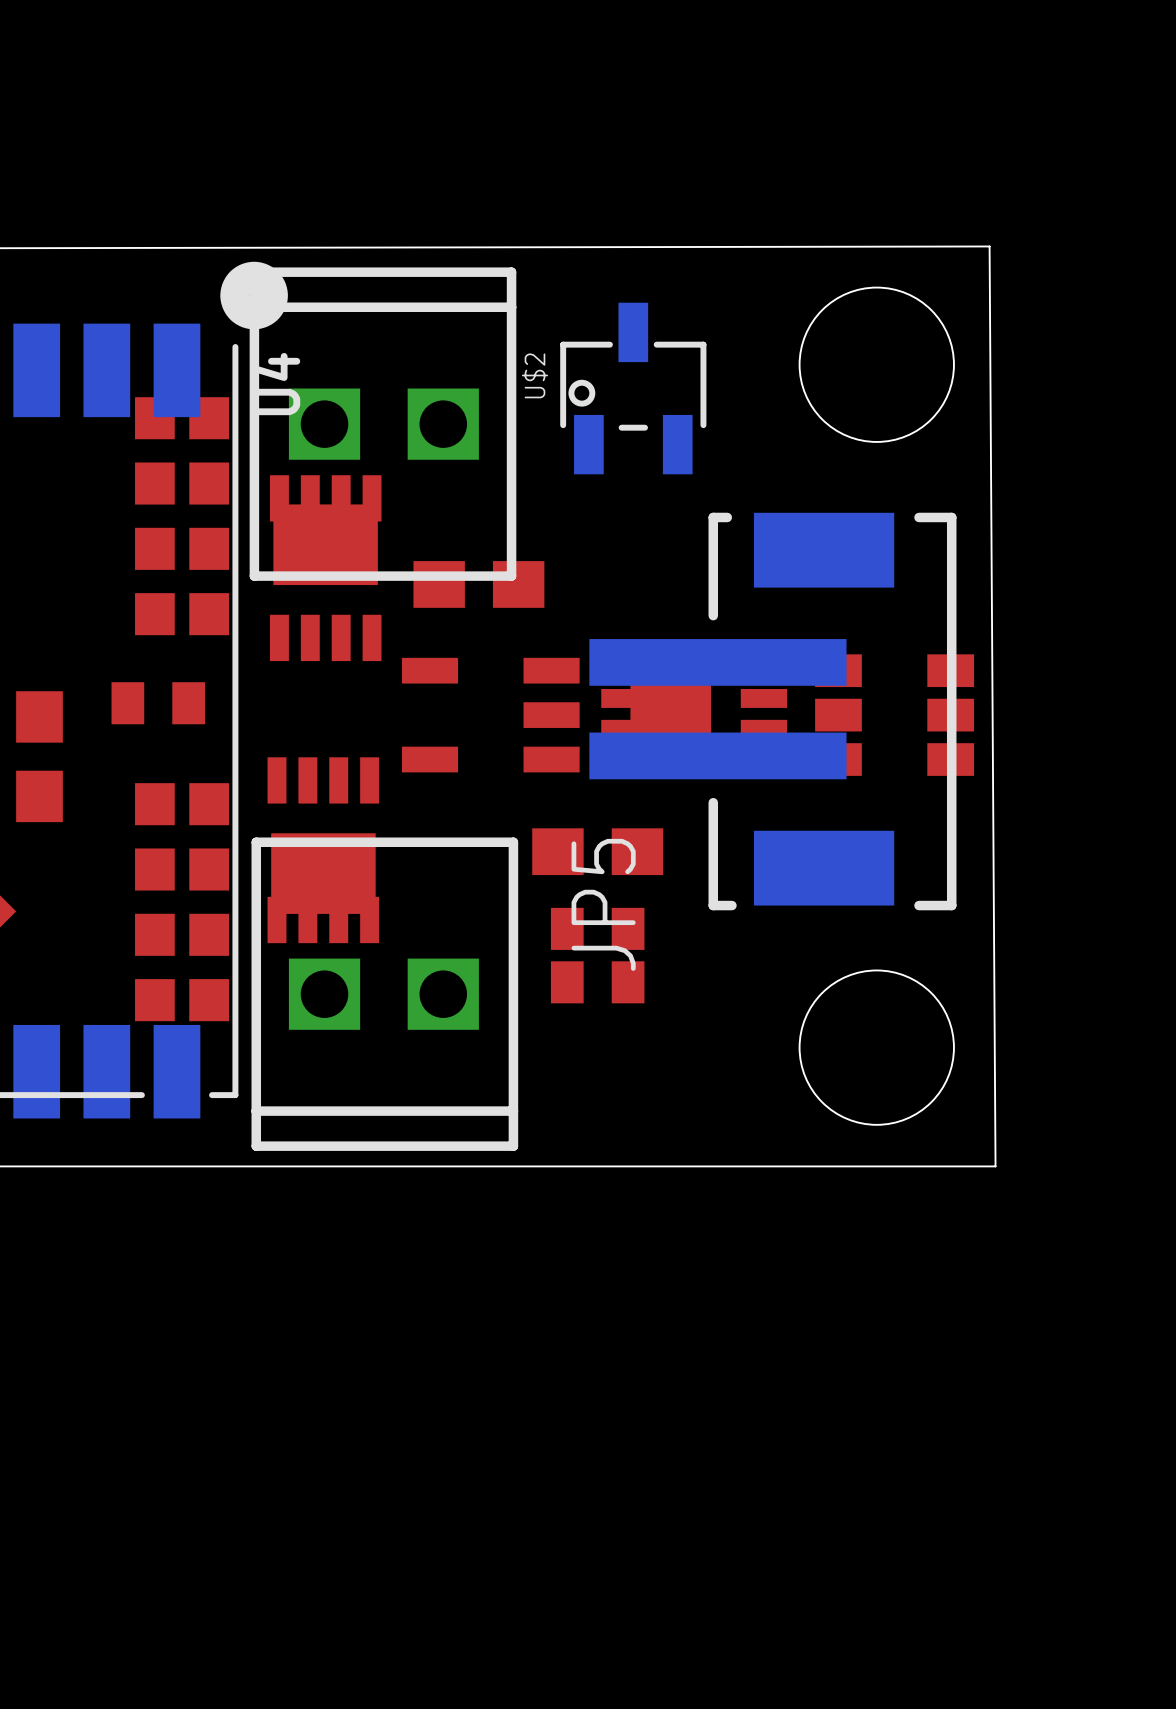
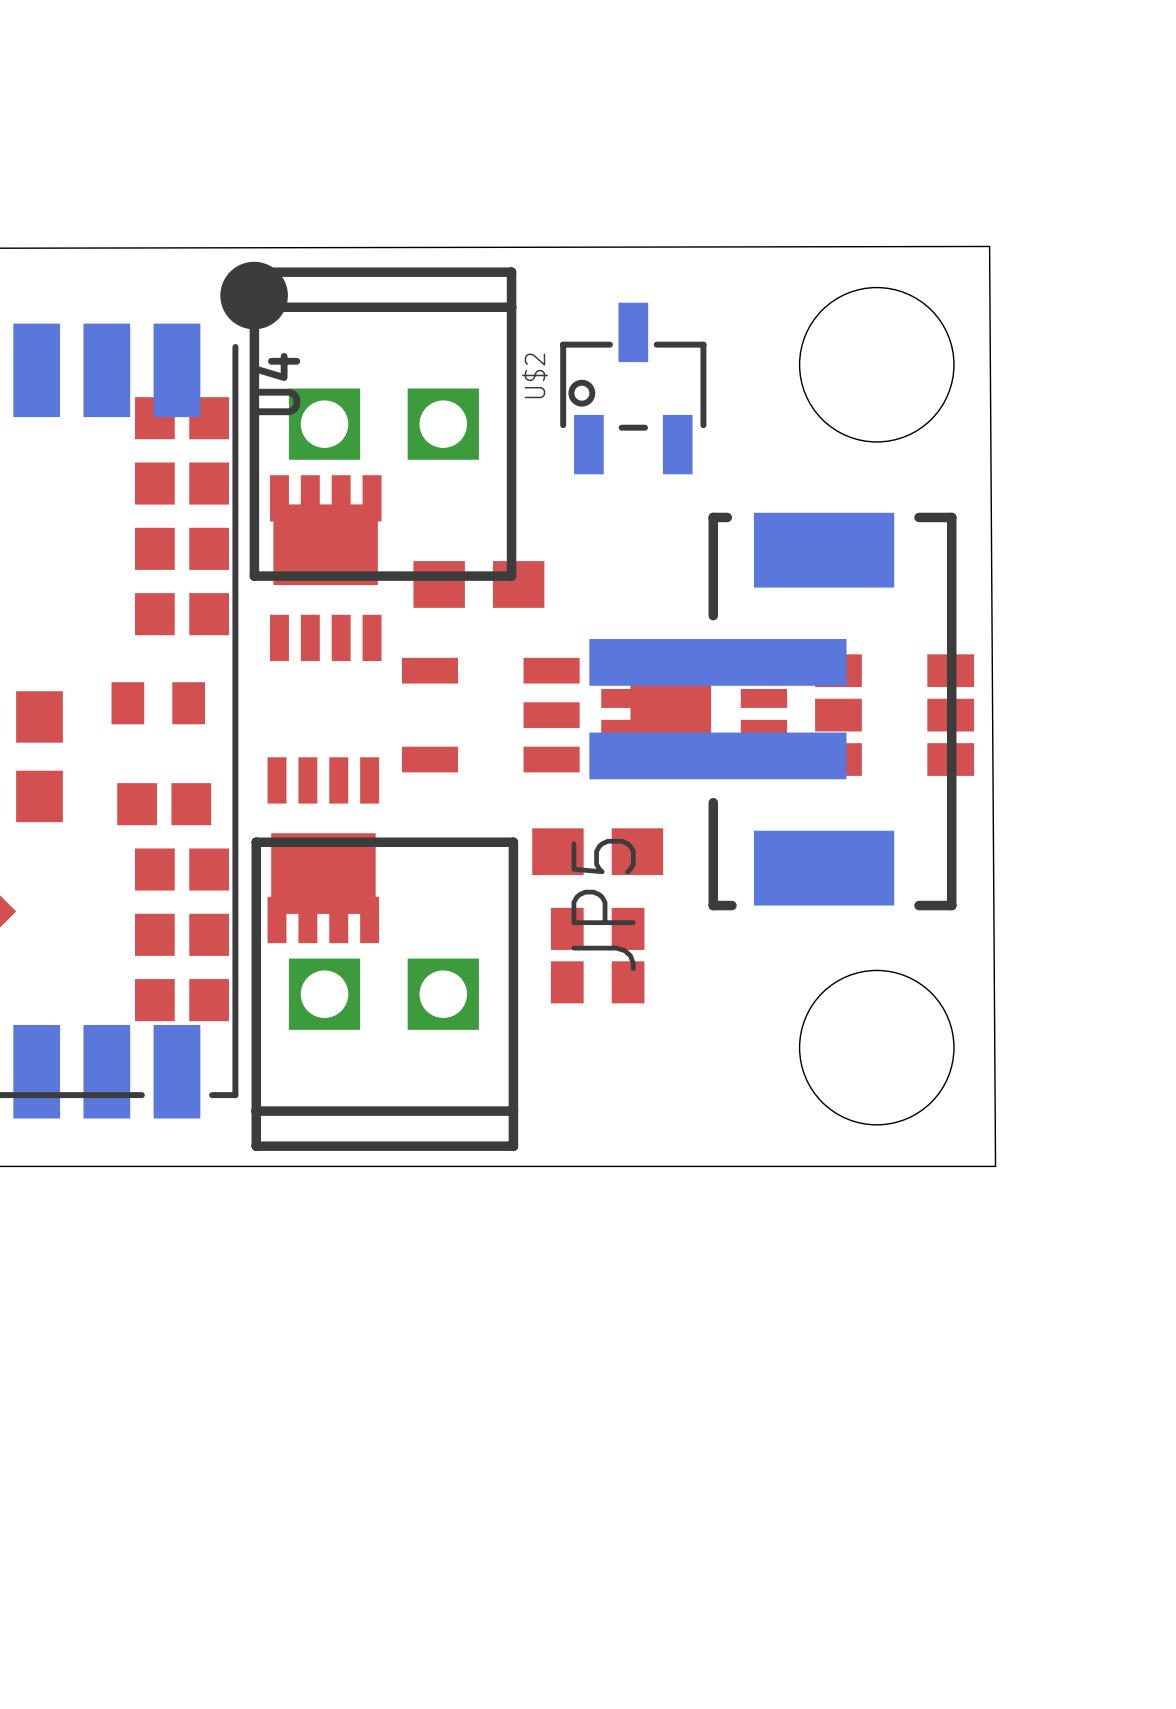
part position: (182, 804) -> (164, 804)

